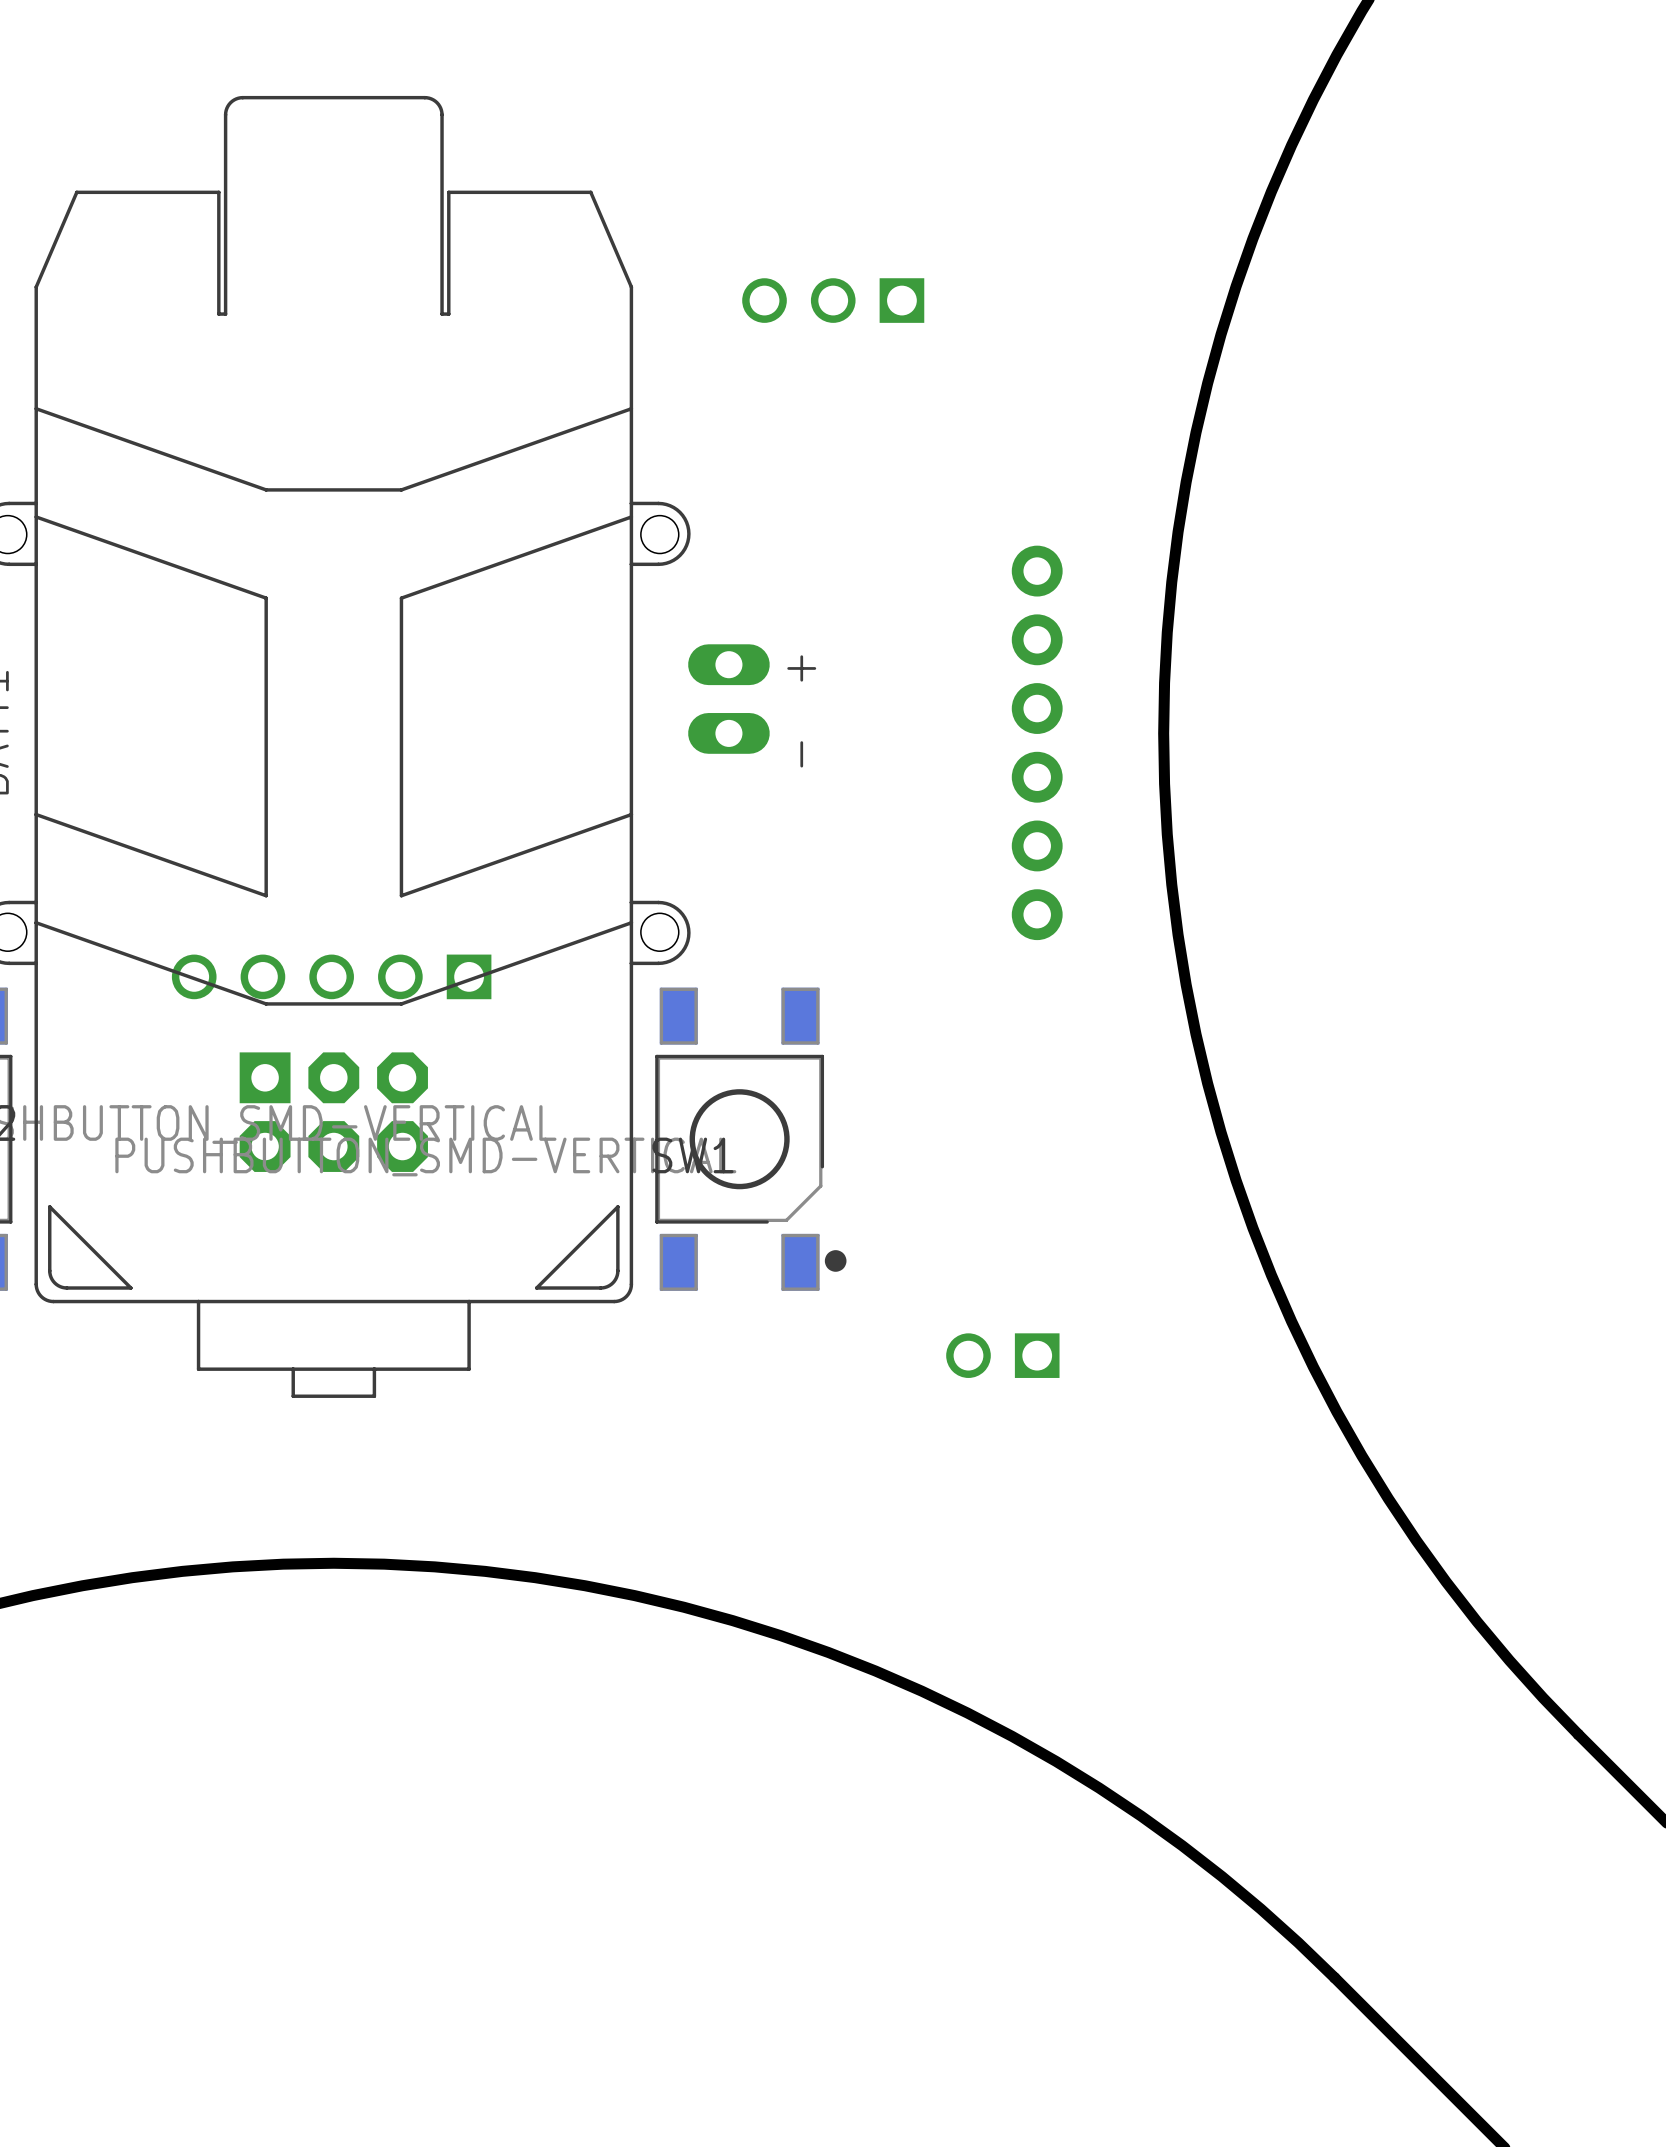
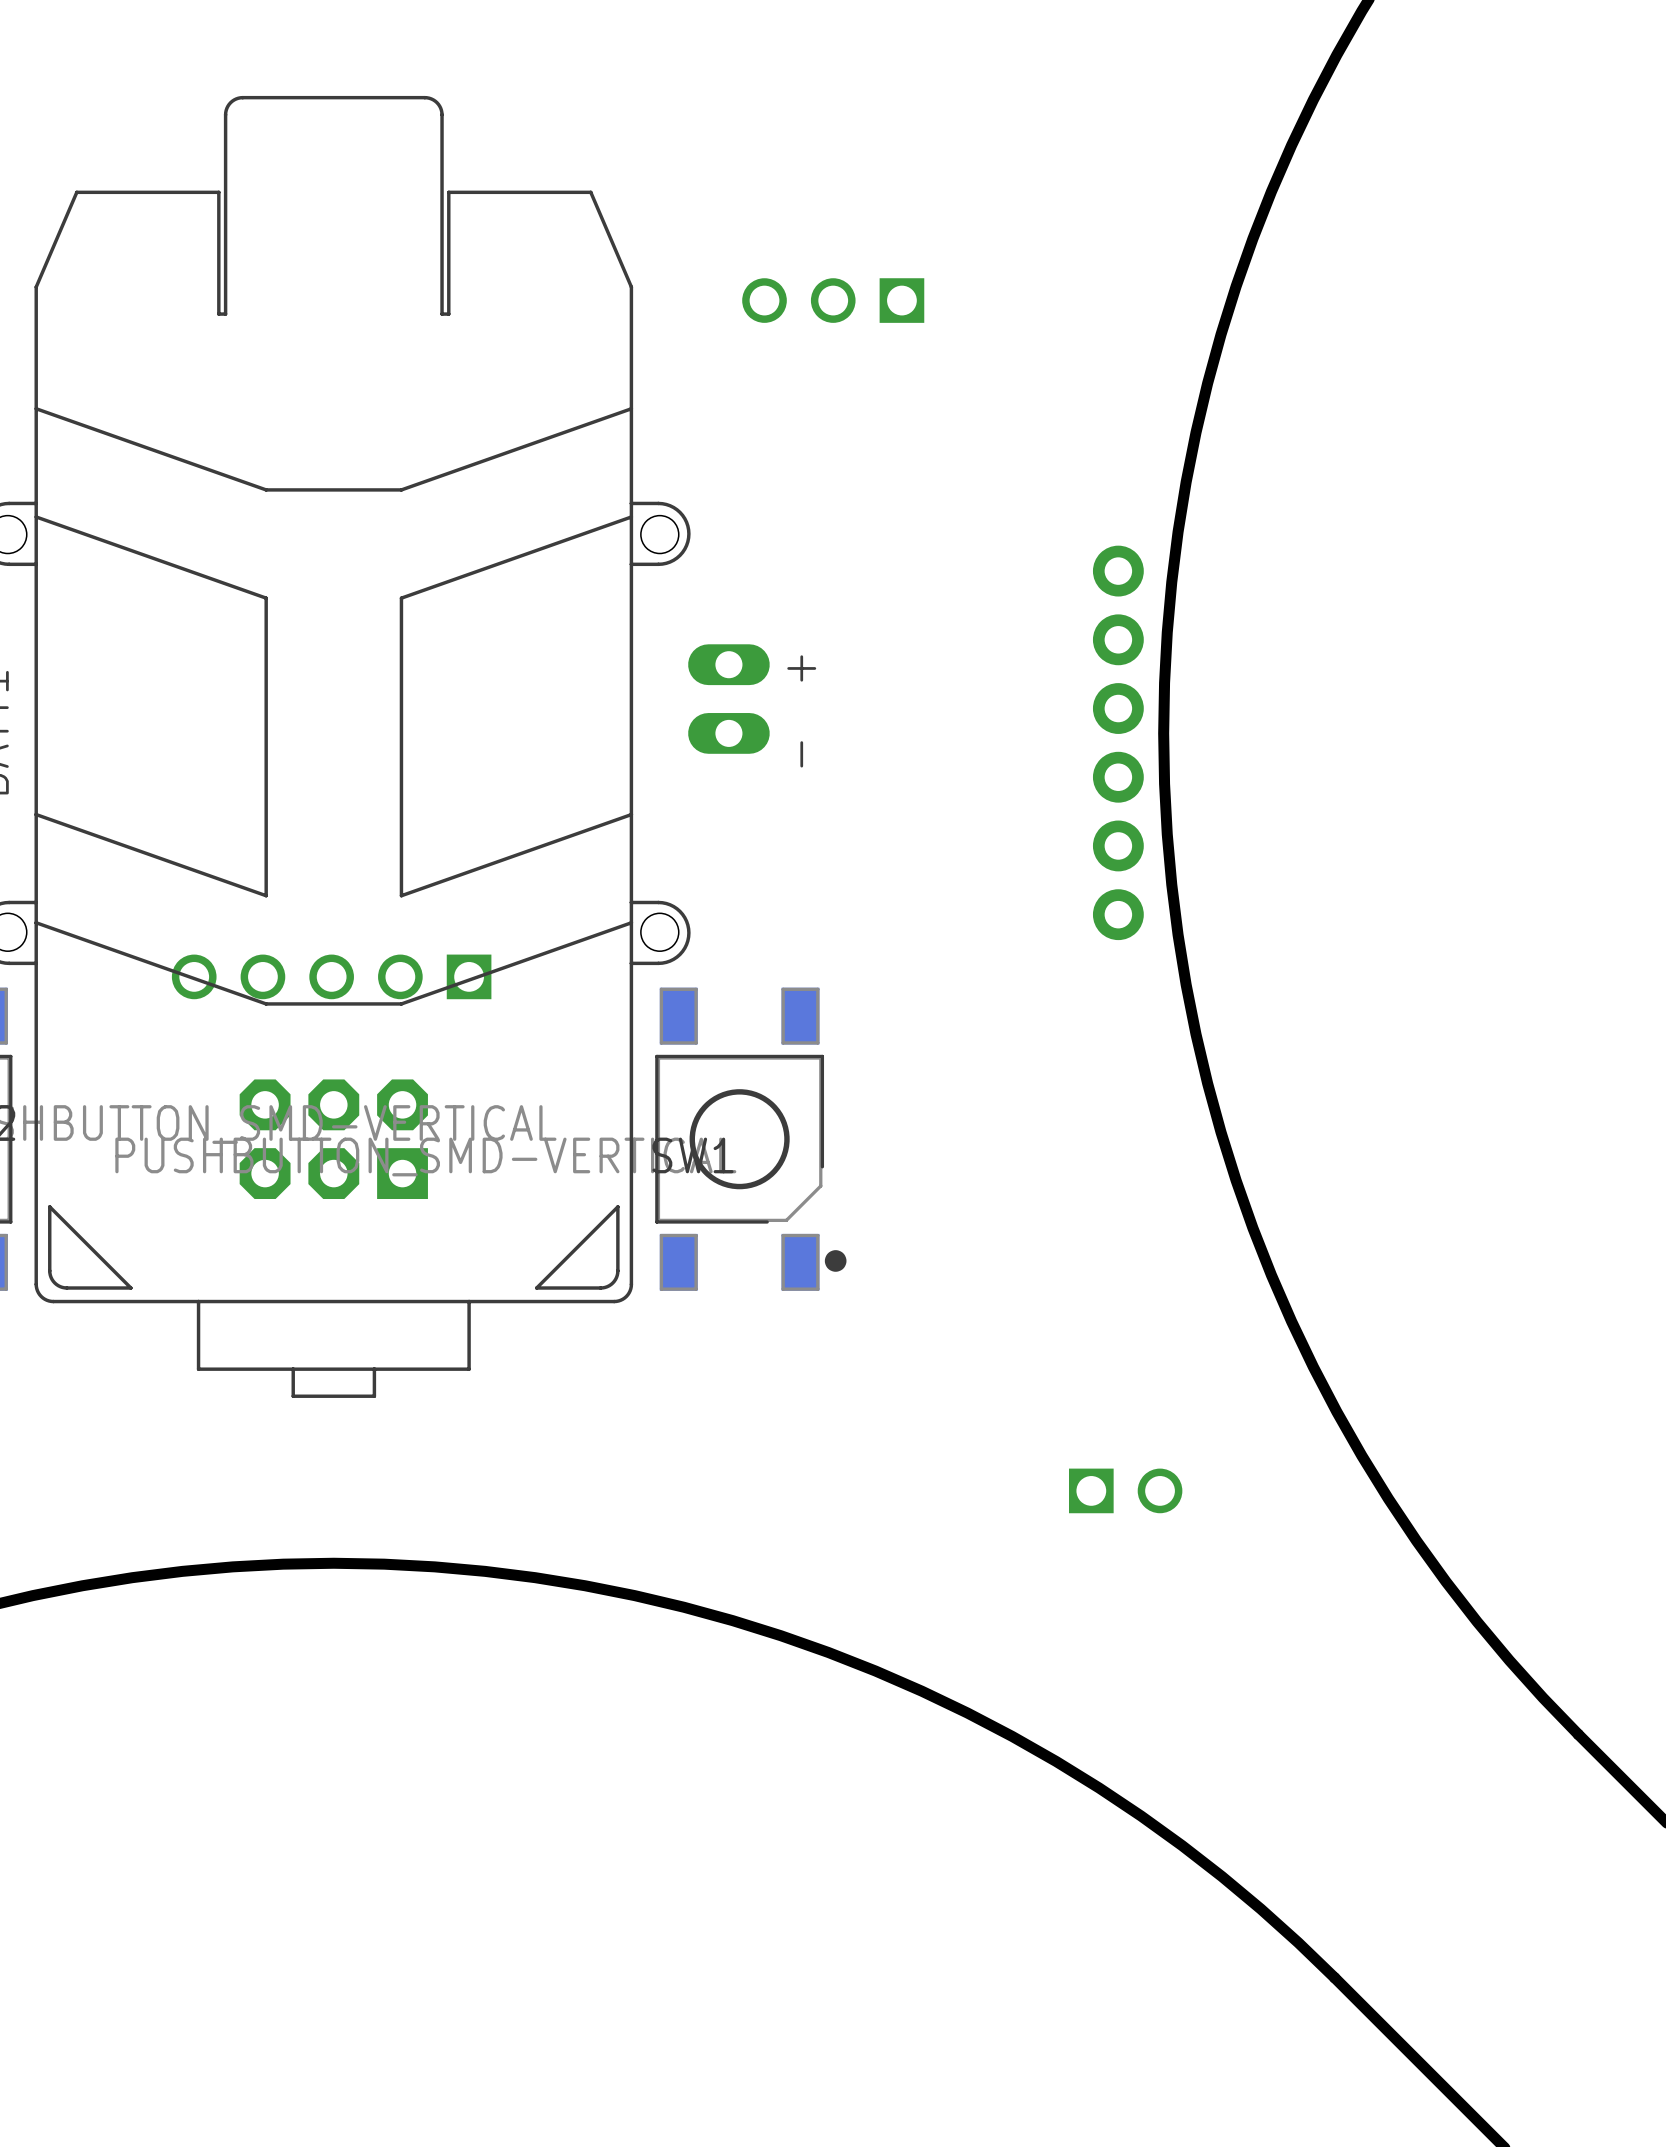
part position: (1037, 742) -> (1118, 742)
part rotation: 0° (333, 1112) -> 180° (333, 1139)
part rotation: 0° (1002, 1355) -> 180° (1125, 1490)
part position: (1002, 1355) -> (1125, 1490)

